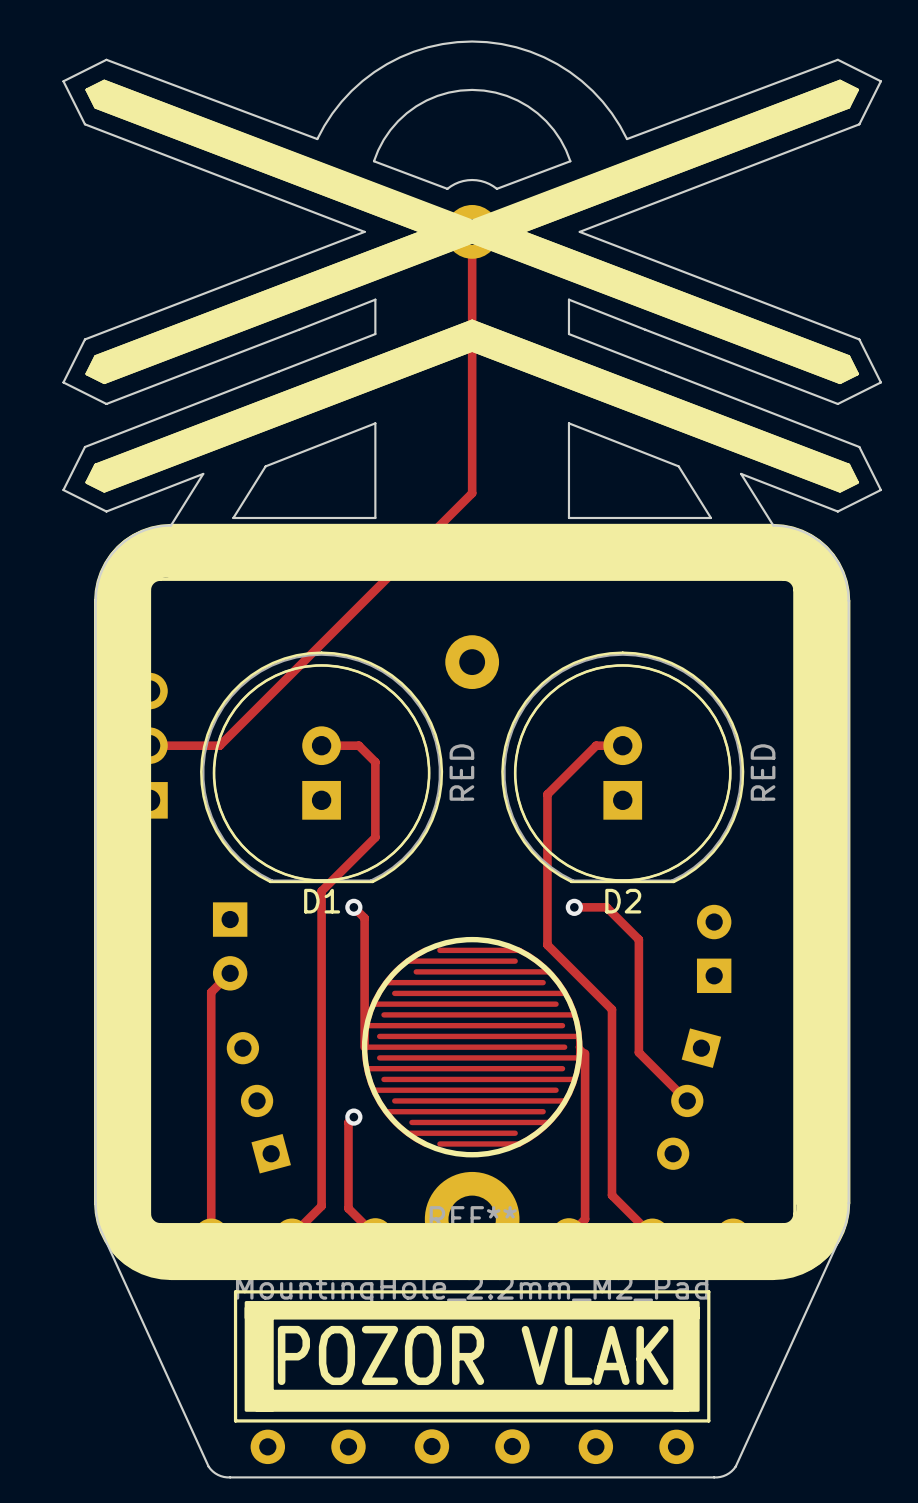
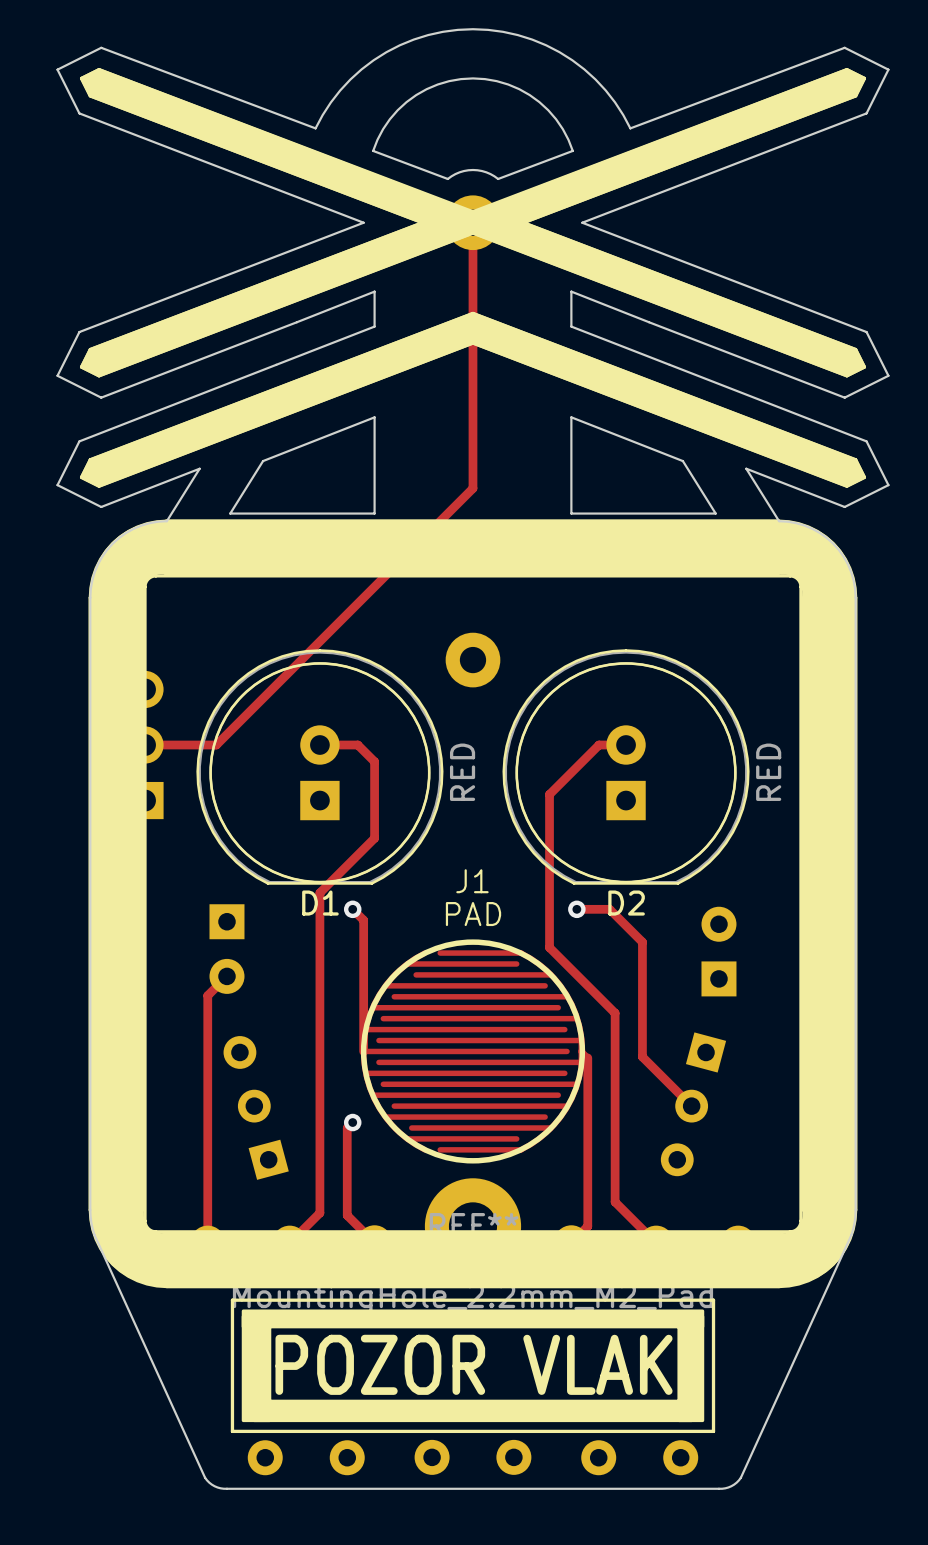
J1 name: none -> J1 (472, 881)
J1 value: none -> PAD (473, 914)

